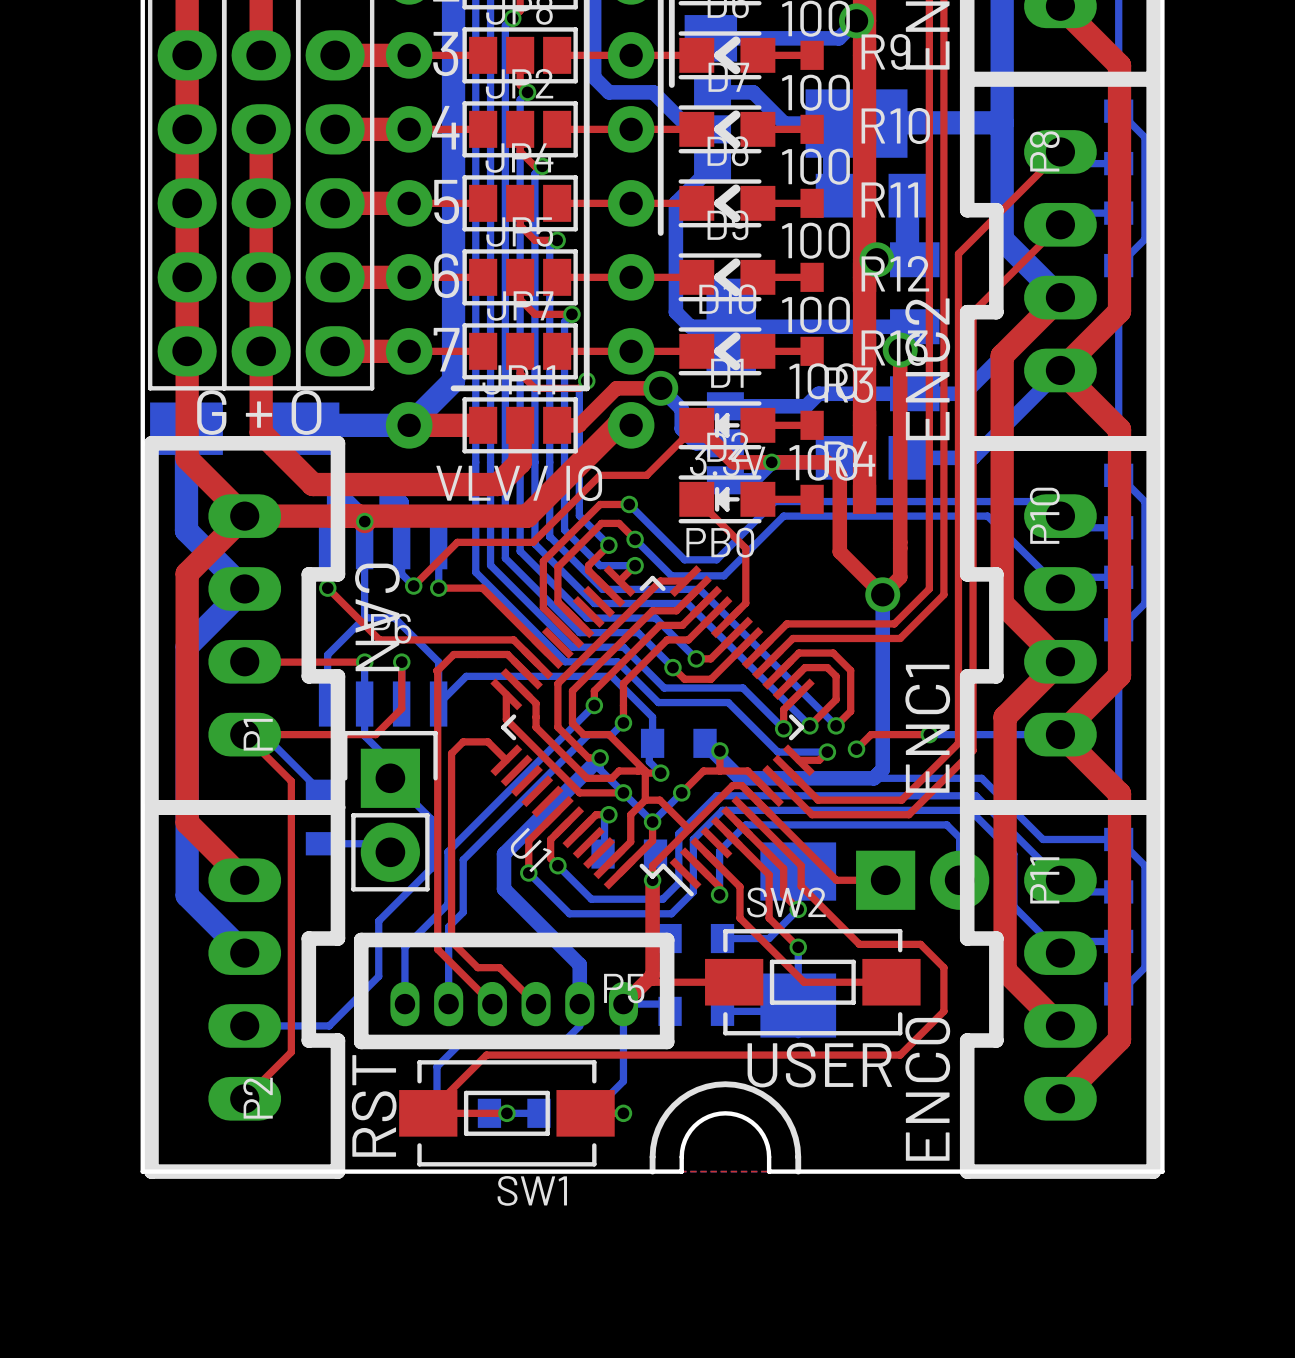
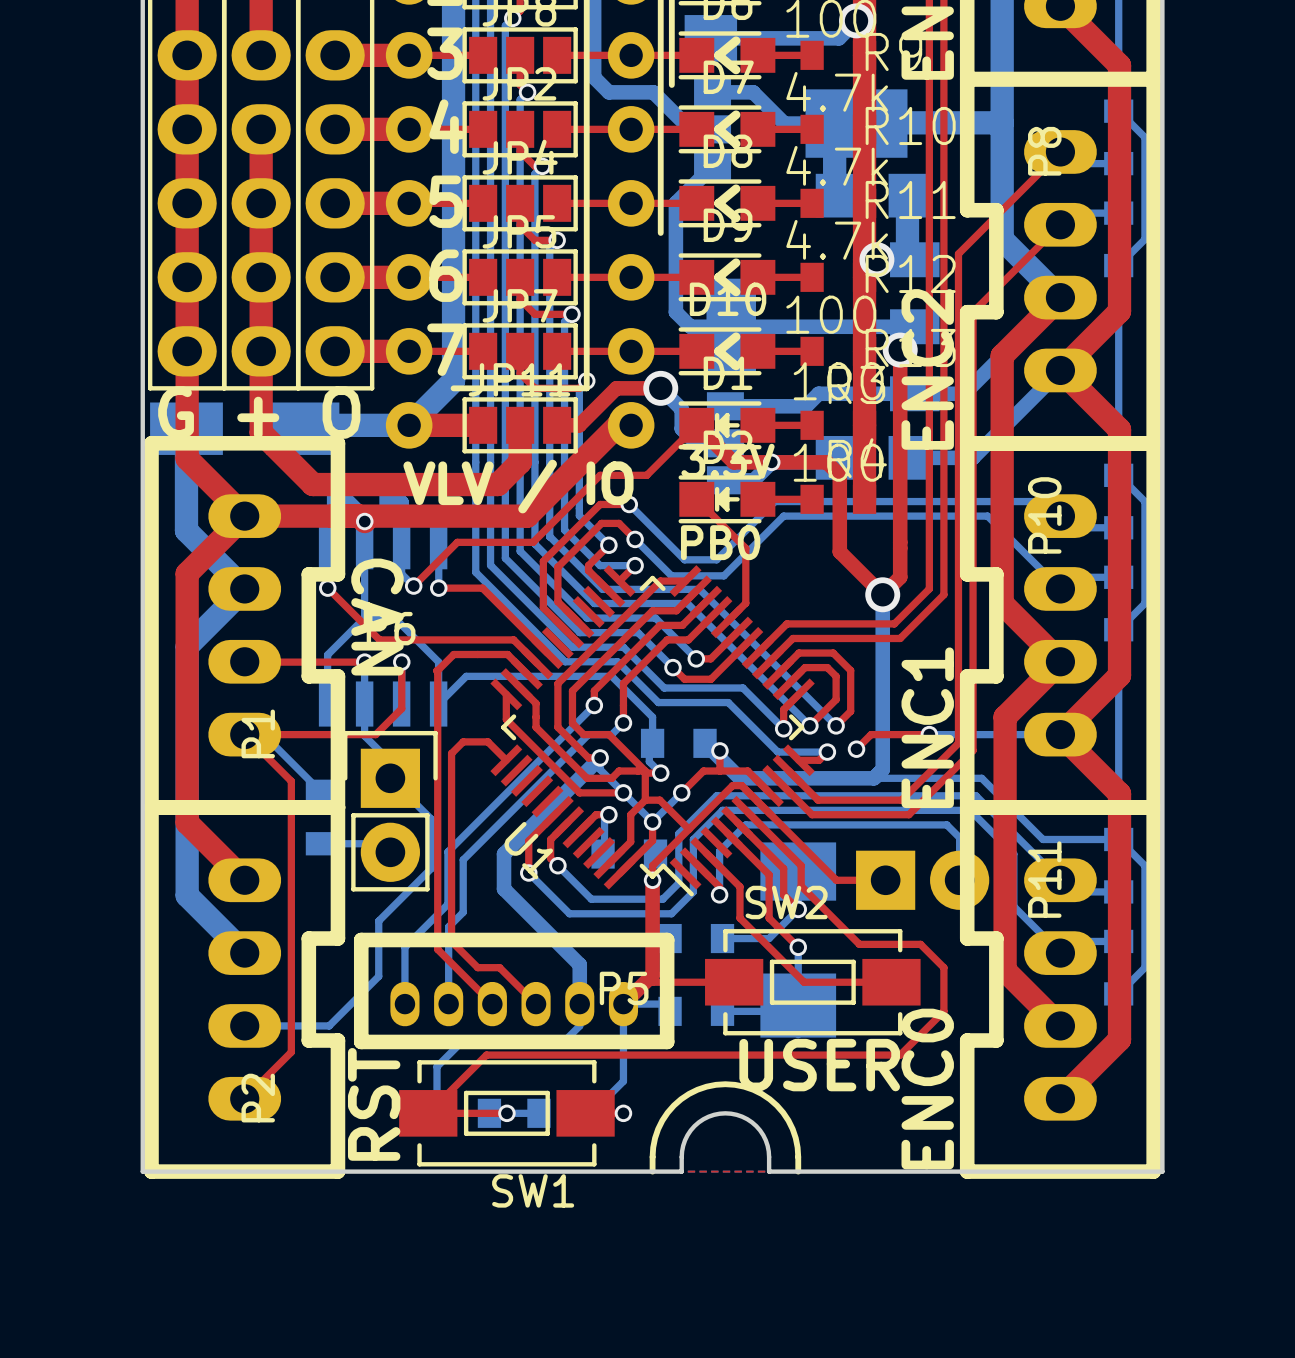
R10 value: 100 (815, 92) -> 4.7k (837, 91)
R11 value: 100 (815, 166) -> 4.7k (837, 165)
R12 value: 100 (815, 240) -> 4.7k (837, 239)

